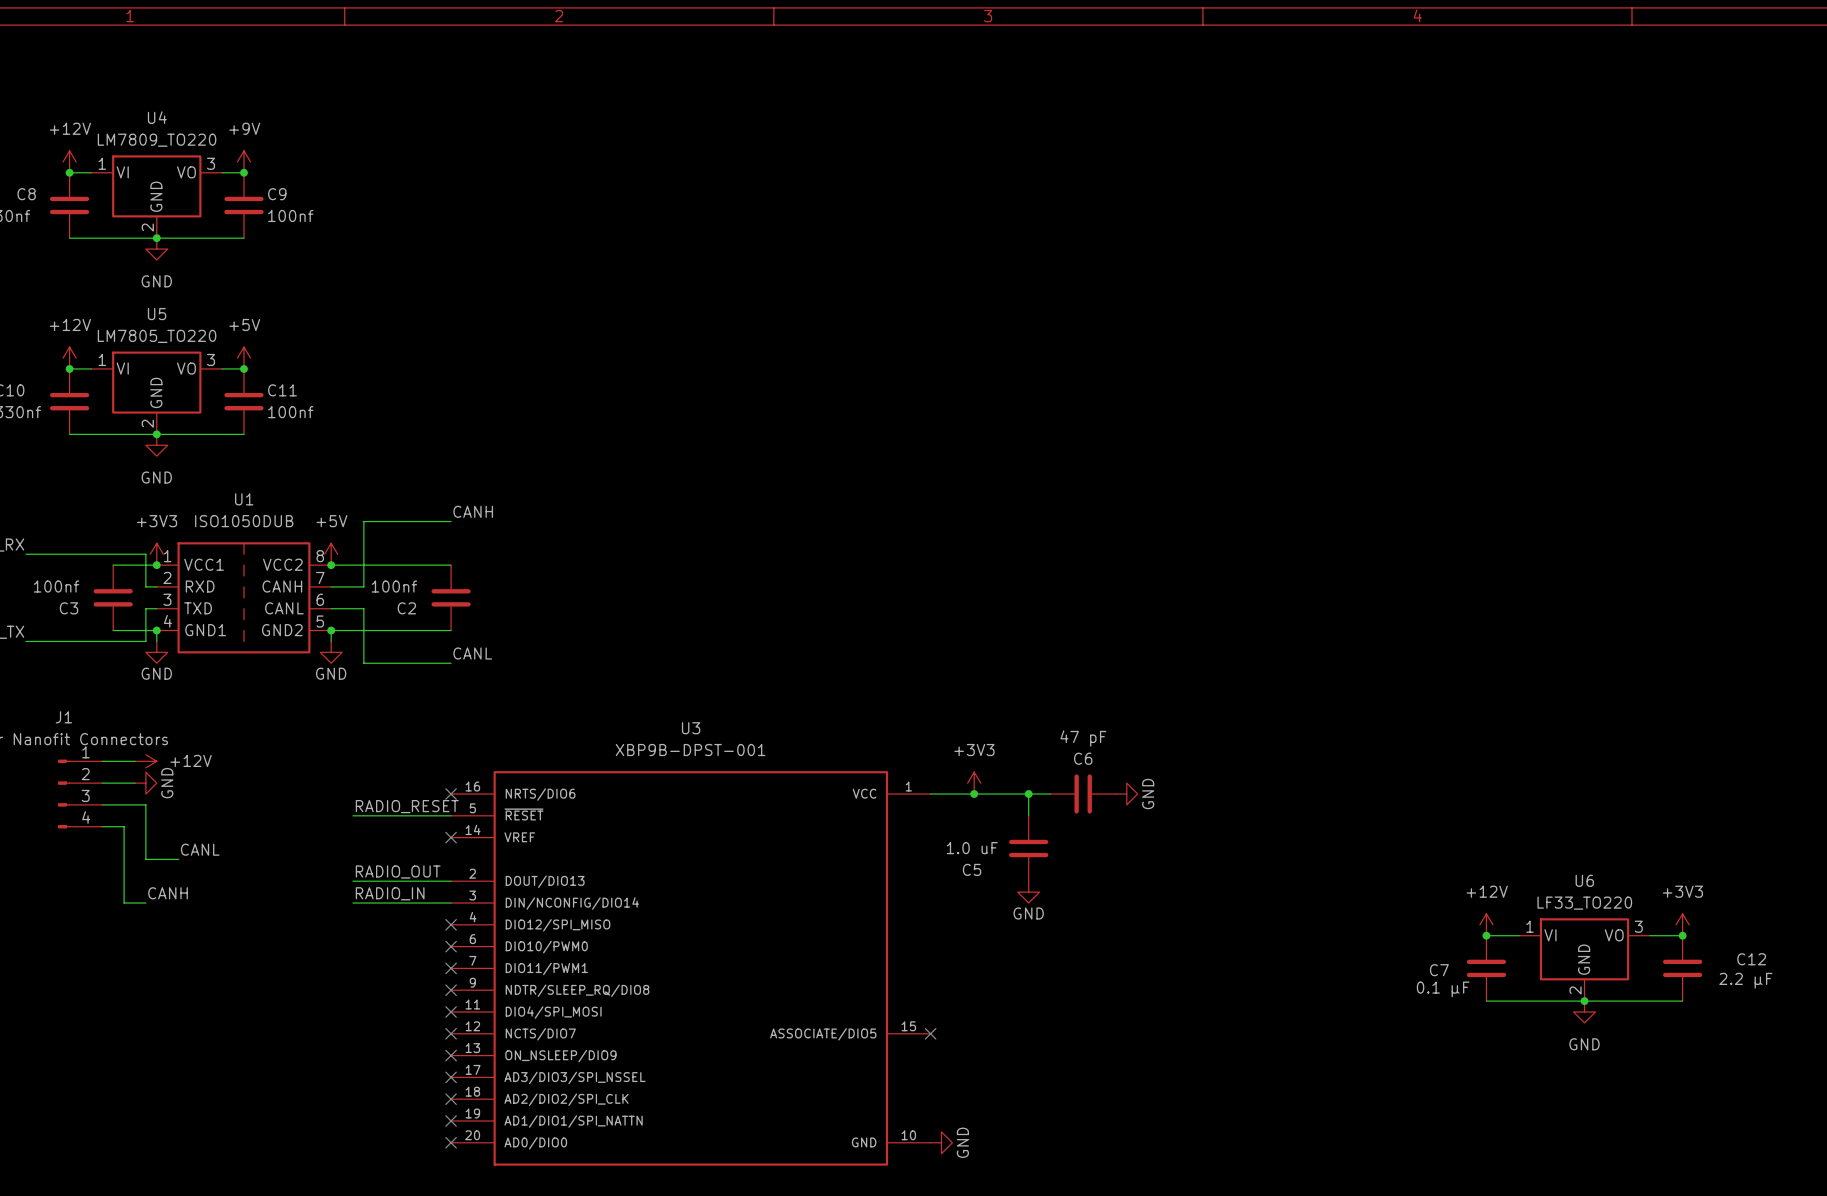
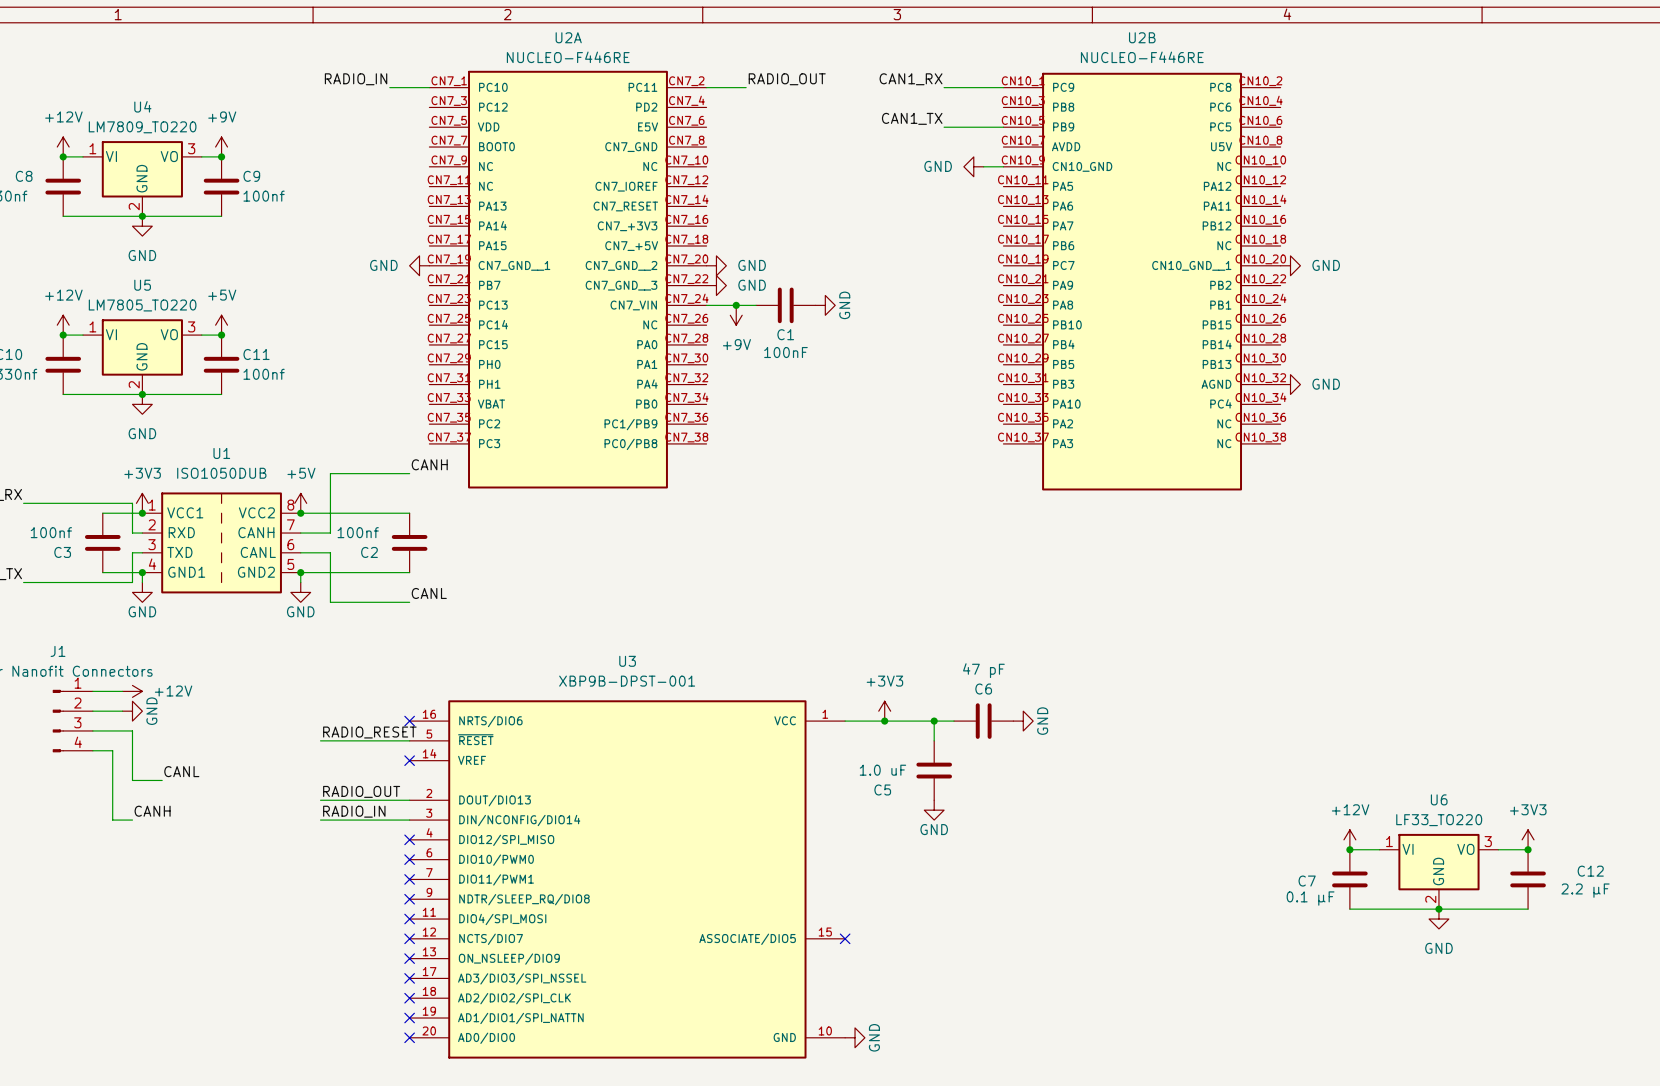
label: none -> RADIO_IN (356, 79)
label: none -> RADIO_OUT (787, 79)
label: none -> CAN1_RX (911, 79)
wire: none -> (389, 87) (429, 87)
wire: none -> (706, 87) (746, 87)
wire: none -> (944, 87) (1003, 87)
label: none -> CAN1_TX (912, 118)
wire: none -> (944, 127) (1003, 127)
power symbol: none -> GND (973, 166)
wire: none -> (983, 166) (1003, 166)
power symbol: none -> GND (419, 265)
power symbol: none -> GND (716, 265)
power symbol: none -> GND (1290, 265)
U2A: none -> NUCLEO-F446RE (567, 279)
U2B: none -> NUCLEO-F446RE (1142, 281)
power symbol: none -> GND (716, 285)
wire: none -> (706, 305) (756, 305)
junction: none -> (736, 305)
C1: none -> 100nF (785, 305)
power symbol: none -> GND (825, 305)
power symbol: none -> +9V (736, 315)
power symbol: none -> GND (1290, 384)

